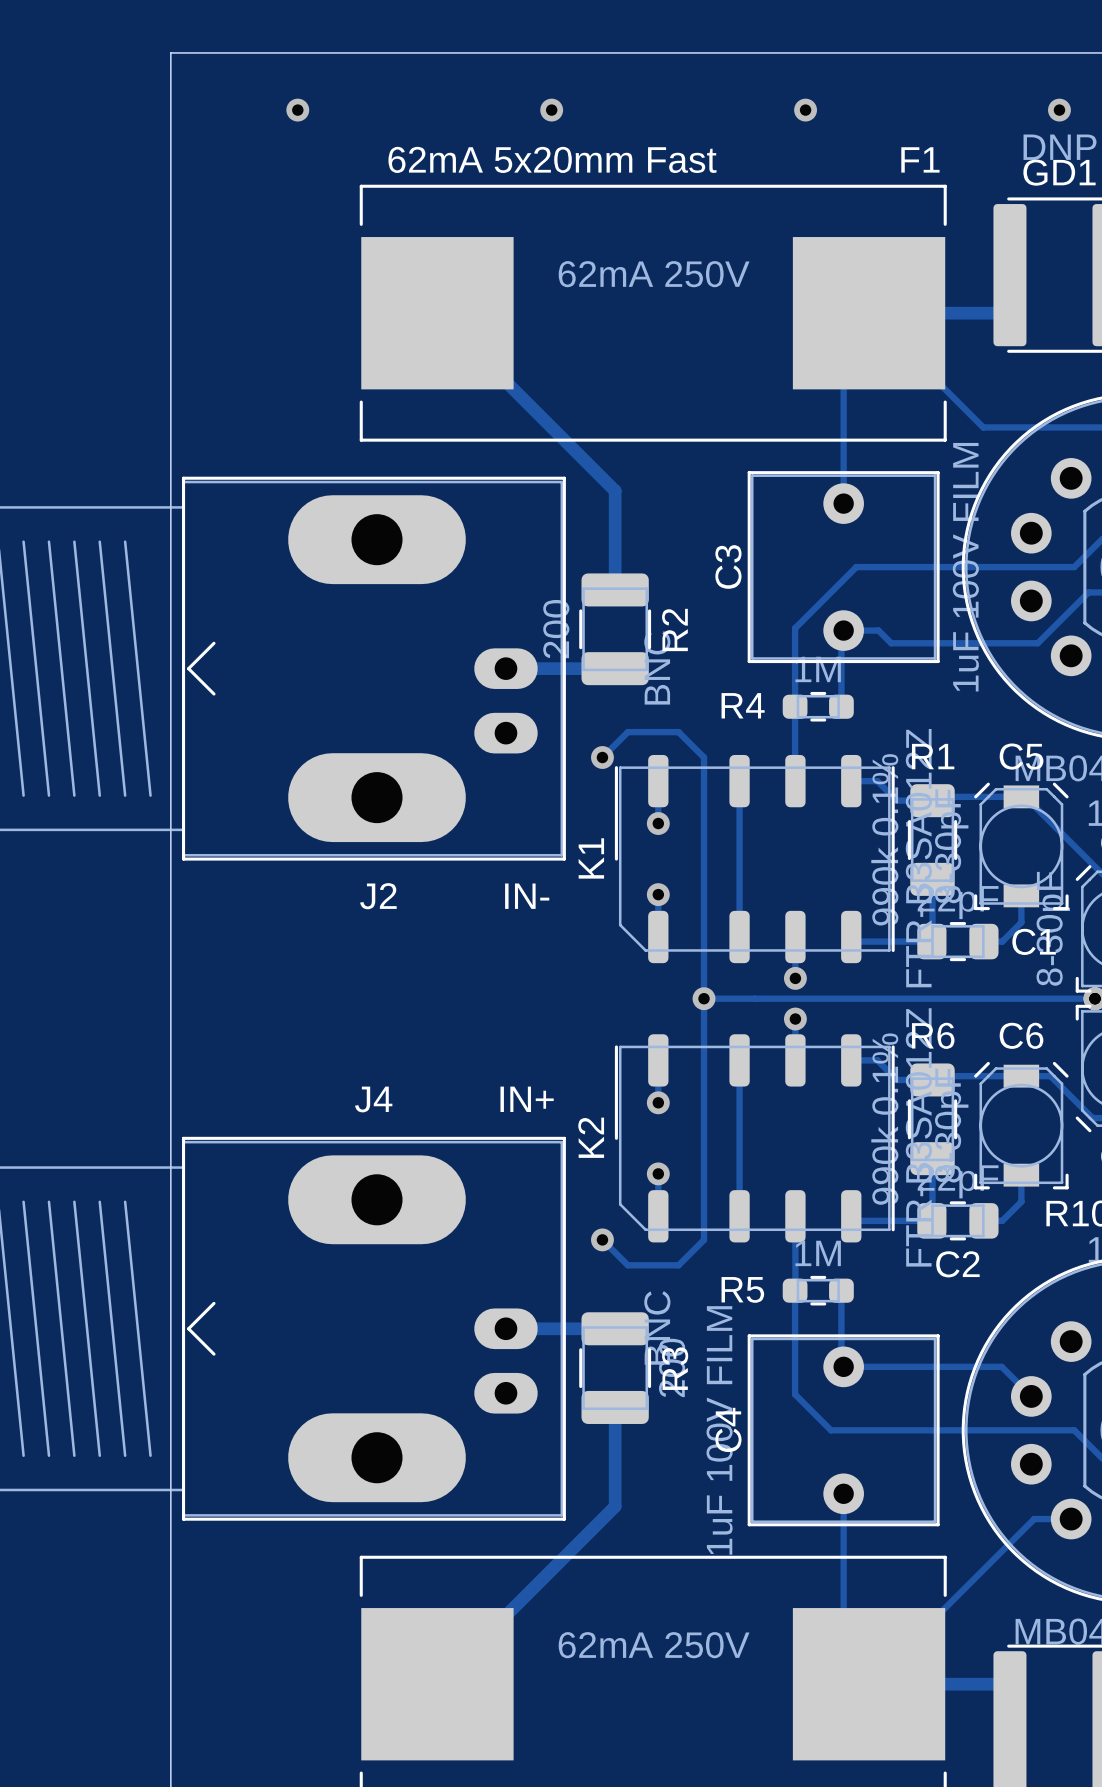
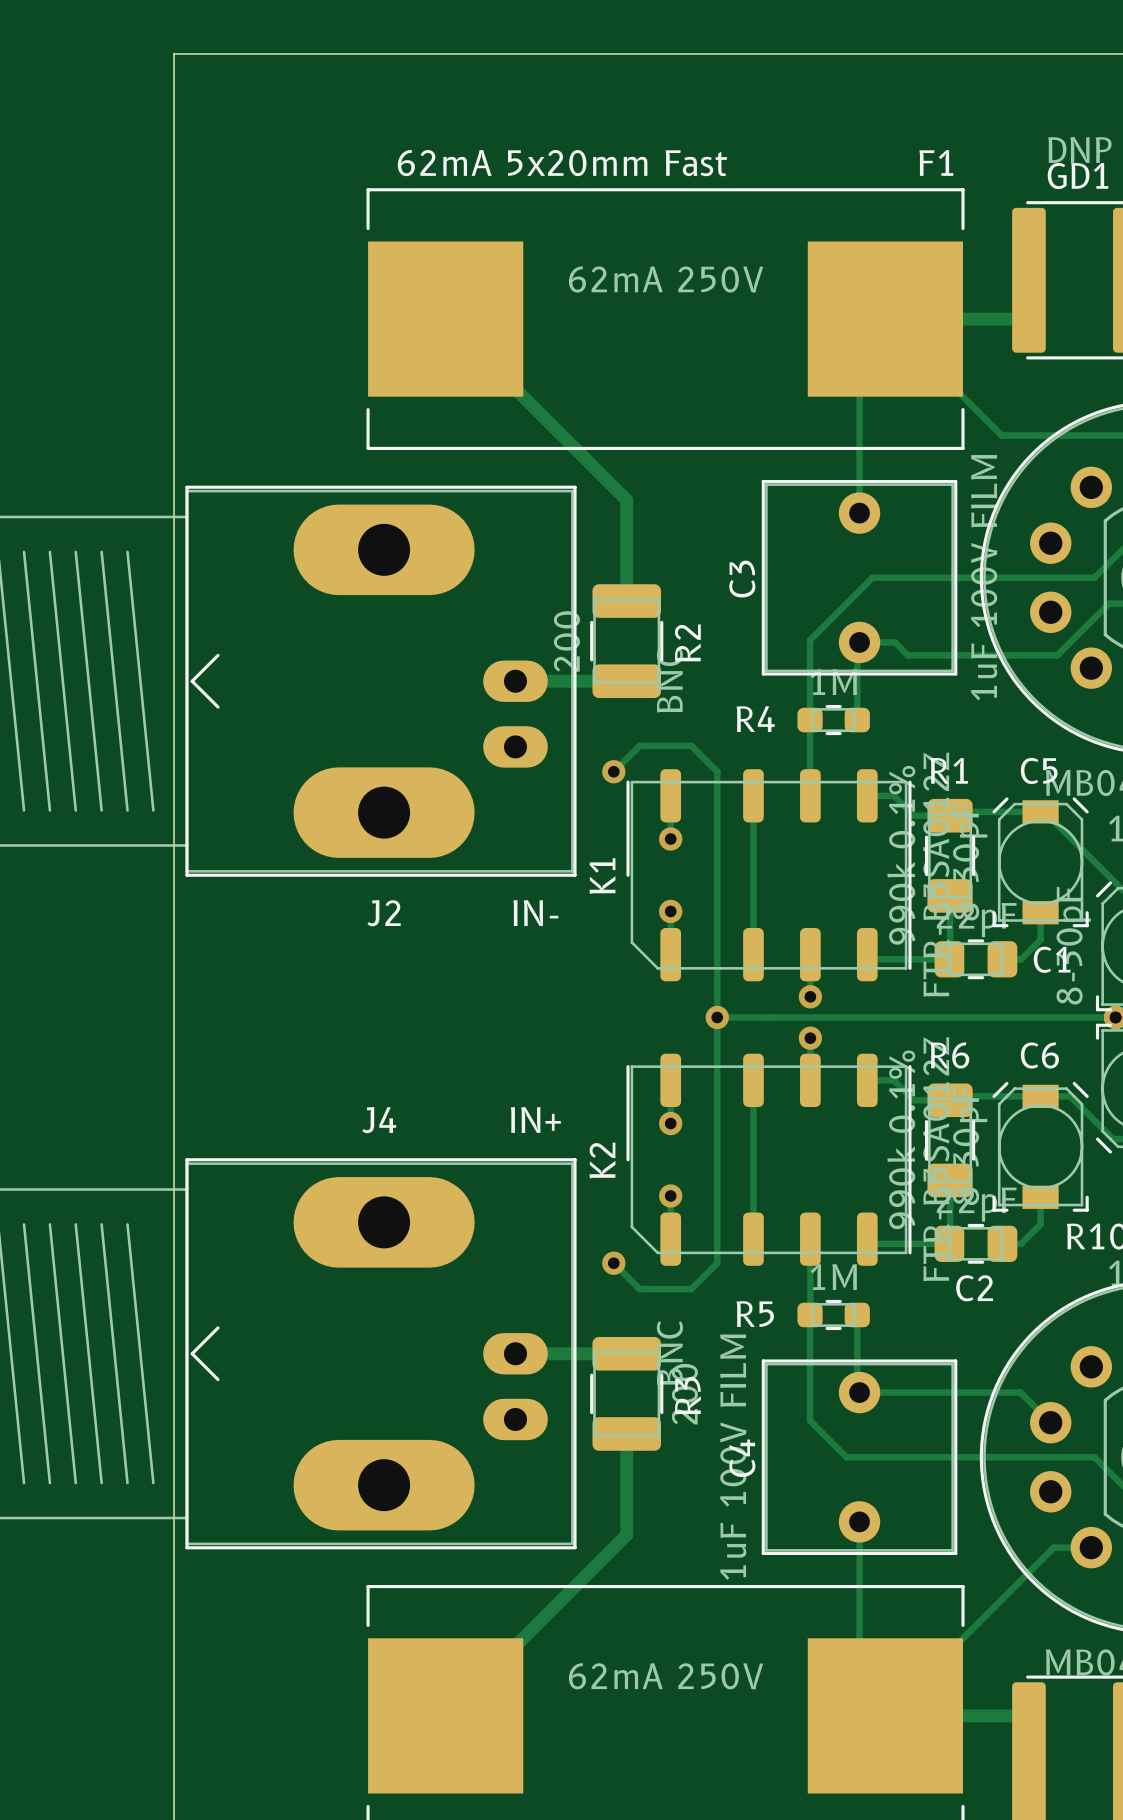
via: (297, 110) -> none
via: (551, 110) -> none
via: (805, 110) -> none
via: (1059, 110) -> none

